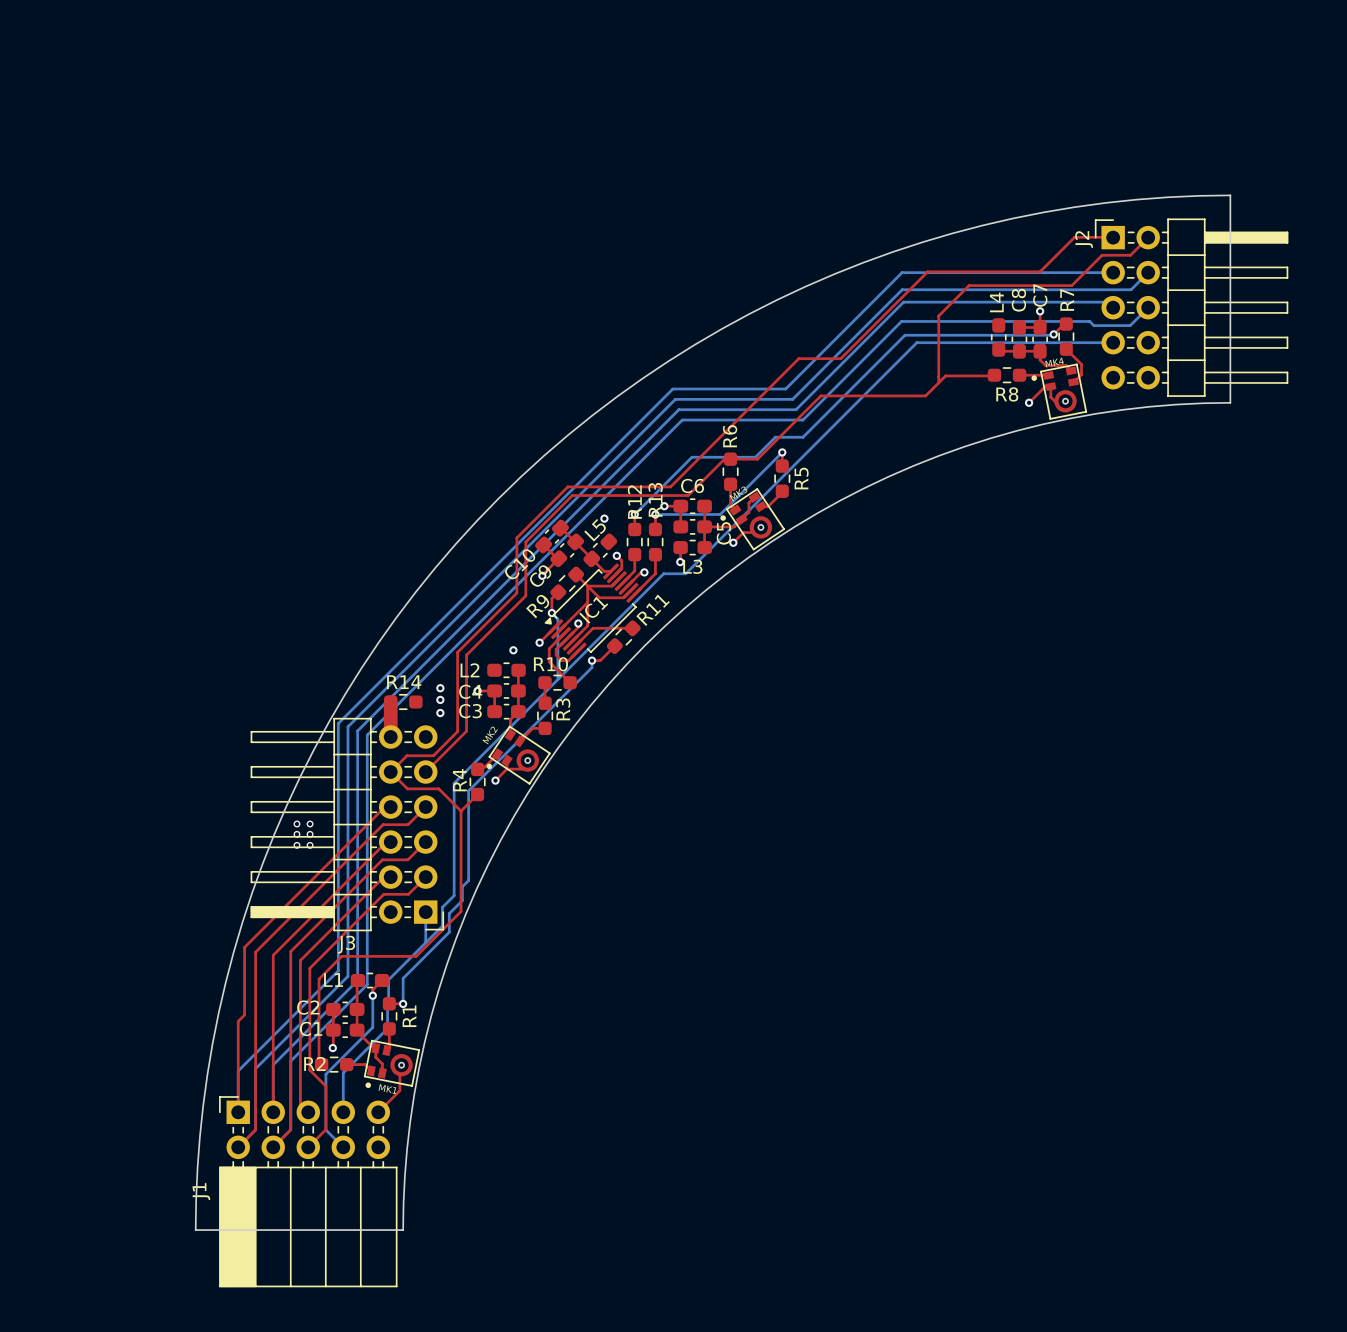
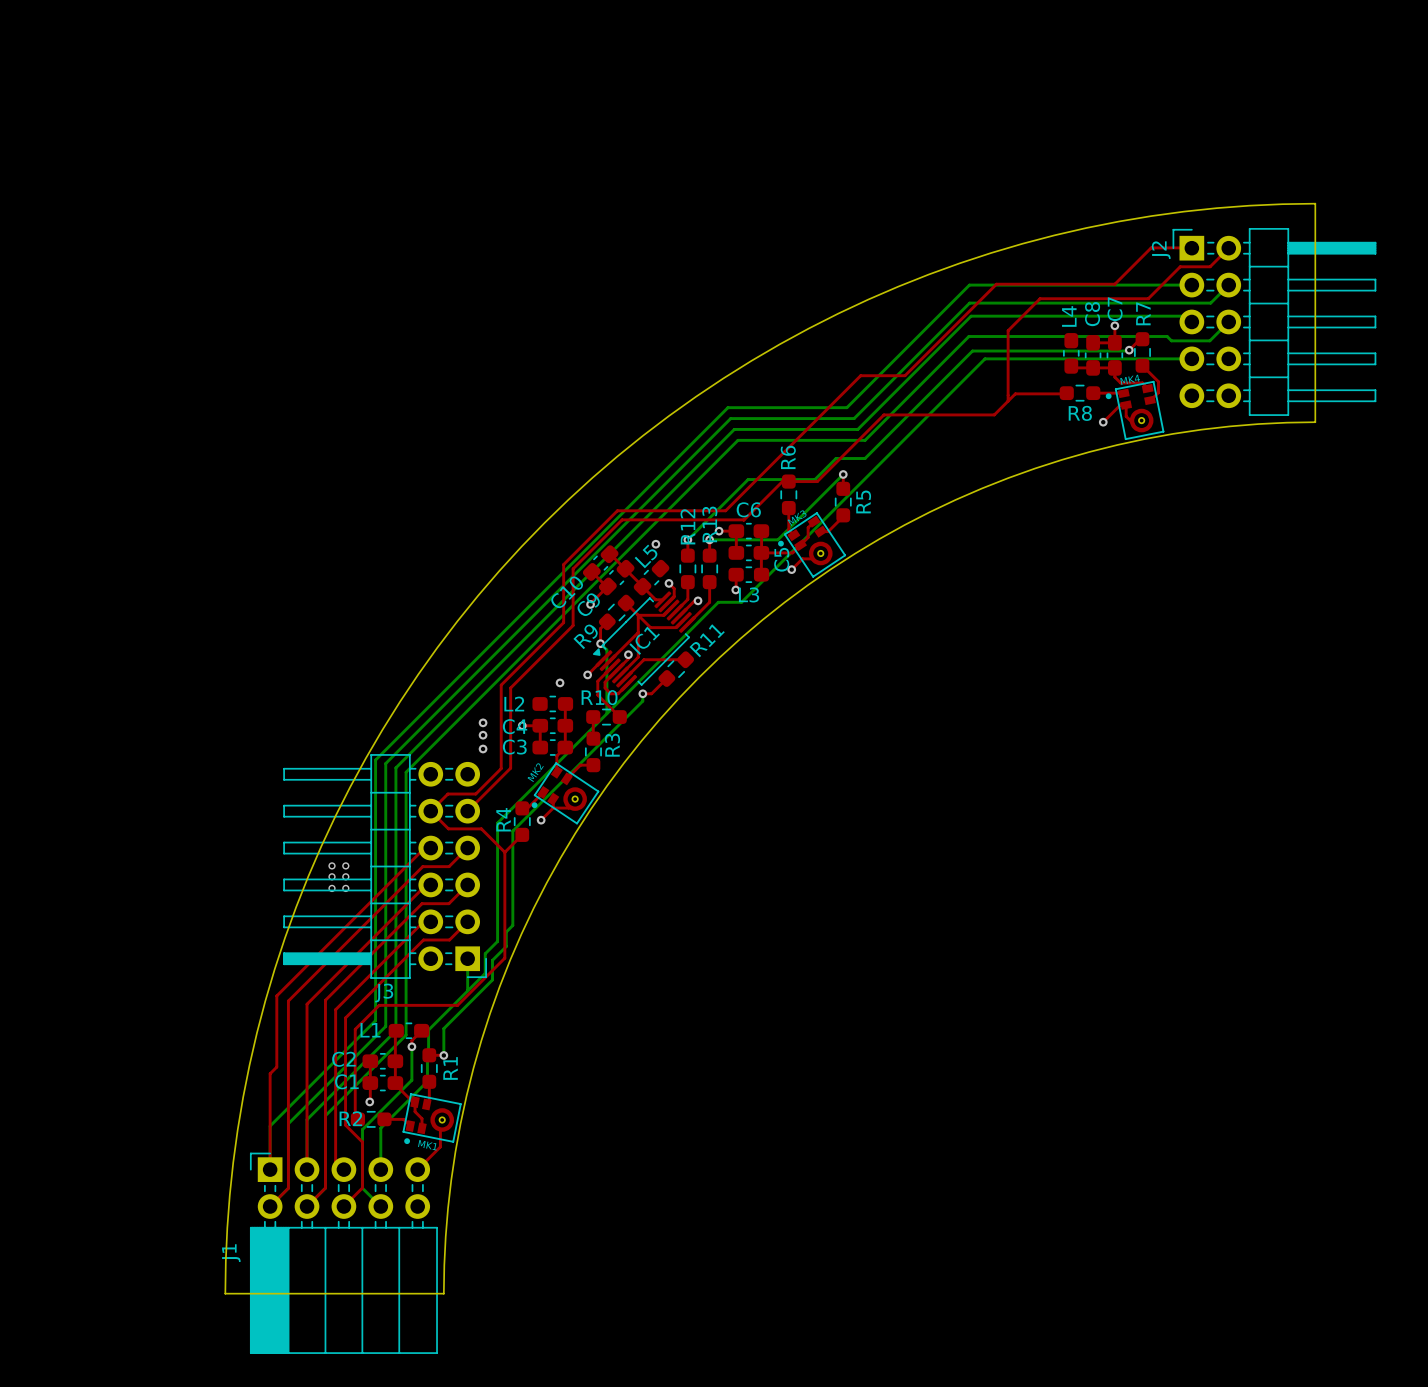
top track: (390, 701) (390, 737) -> none
R14: (403, 701) -> none

